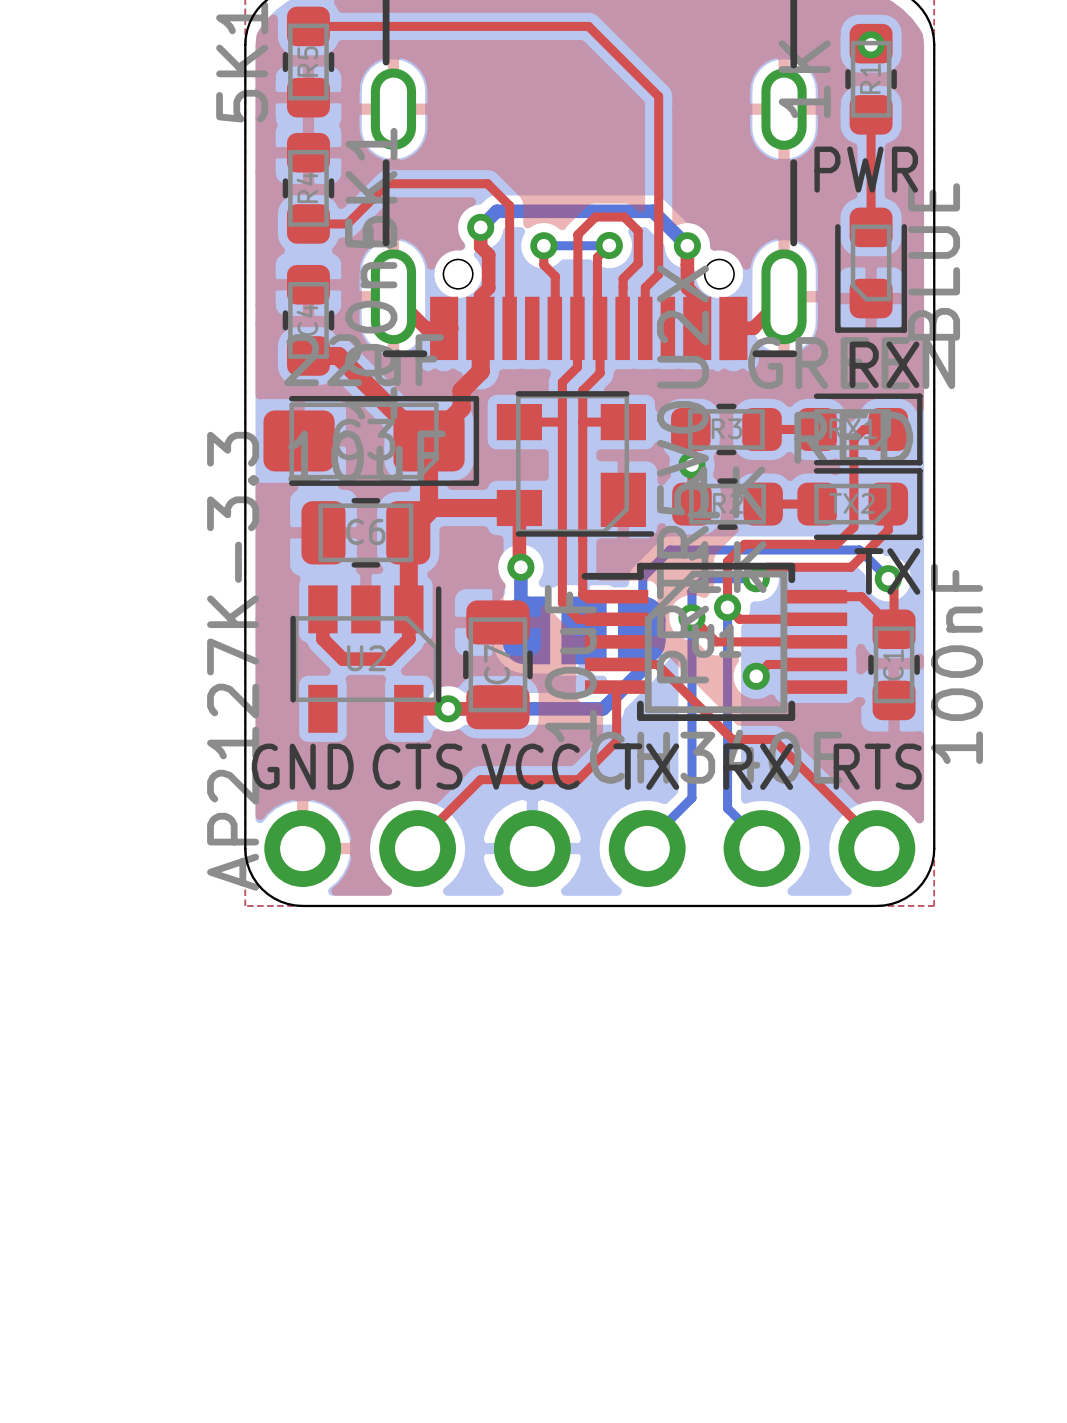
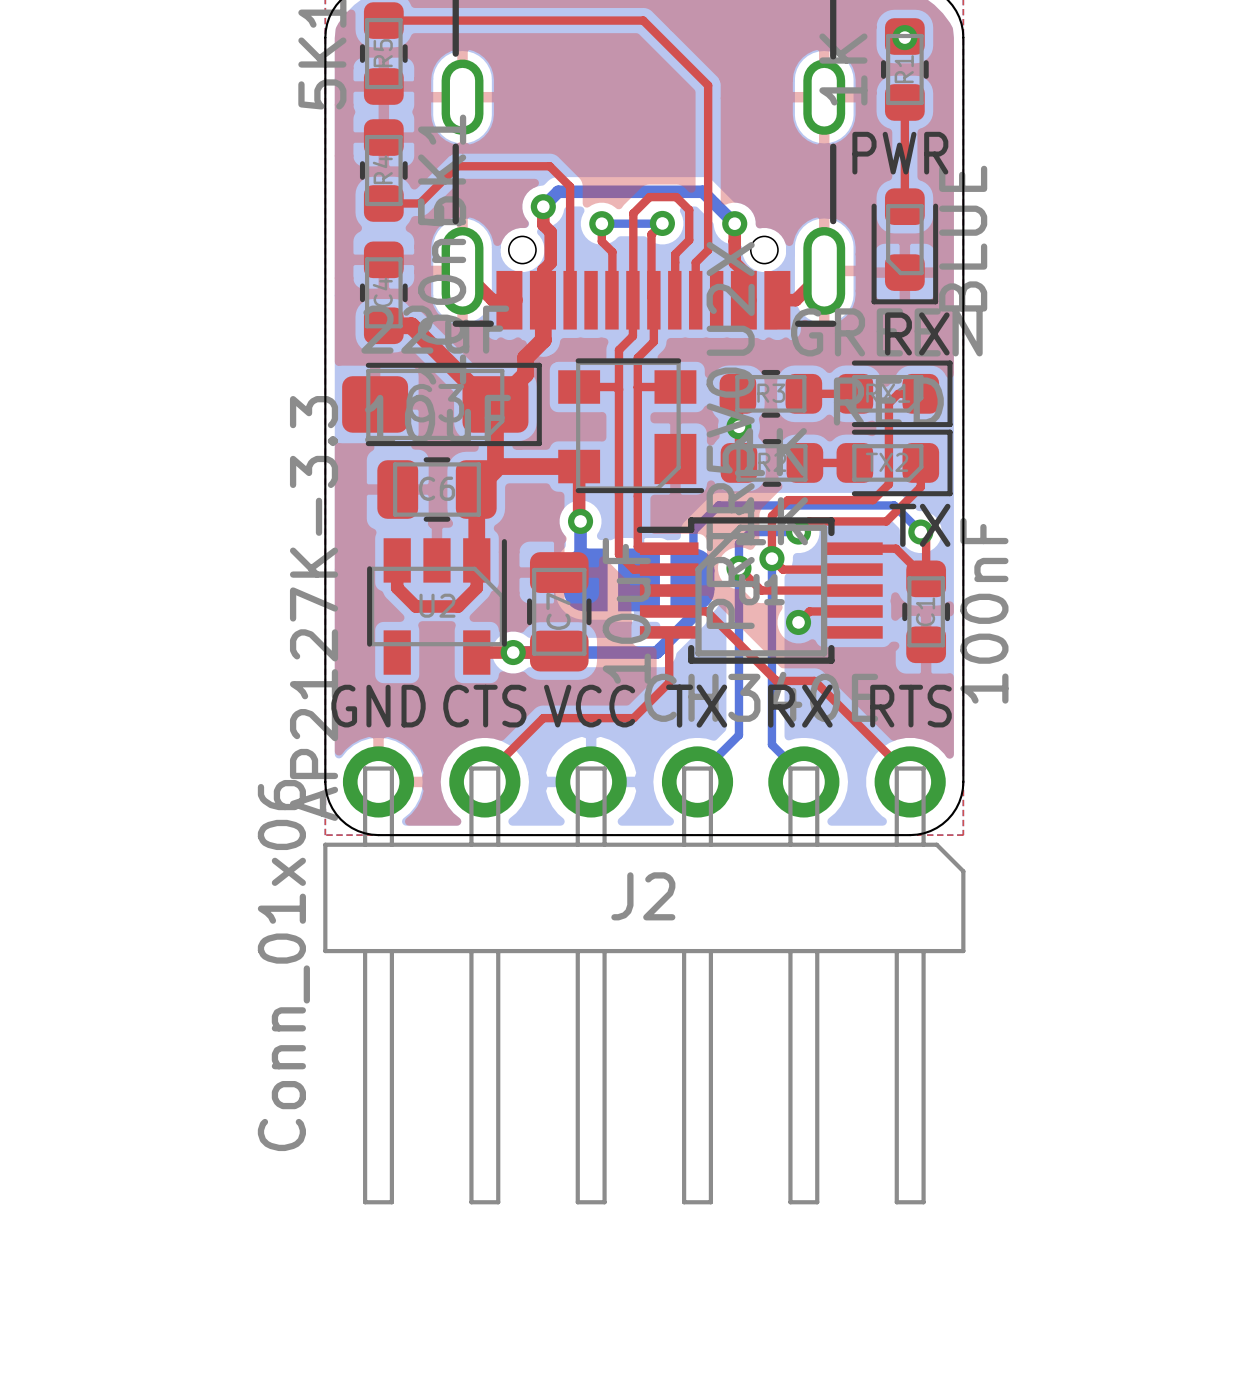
J2 side: bottom (589, 848) -> top (644, 975)

